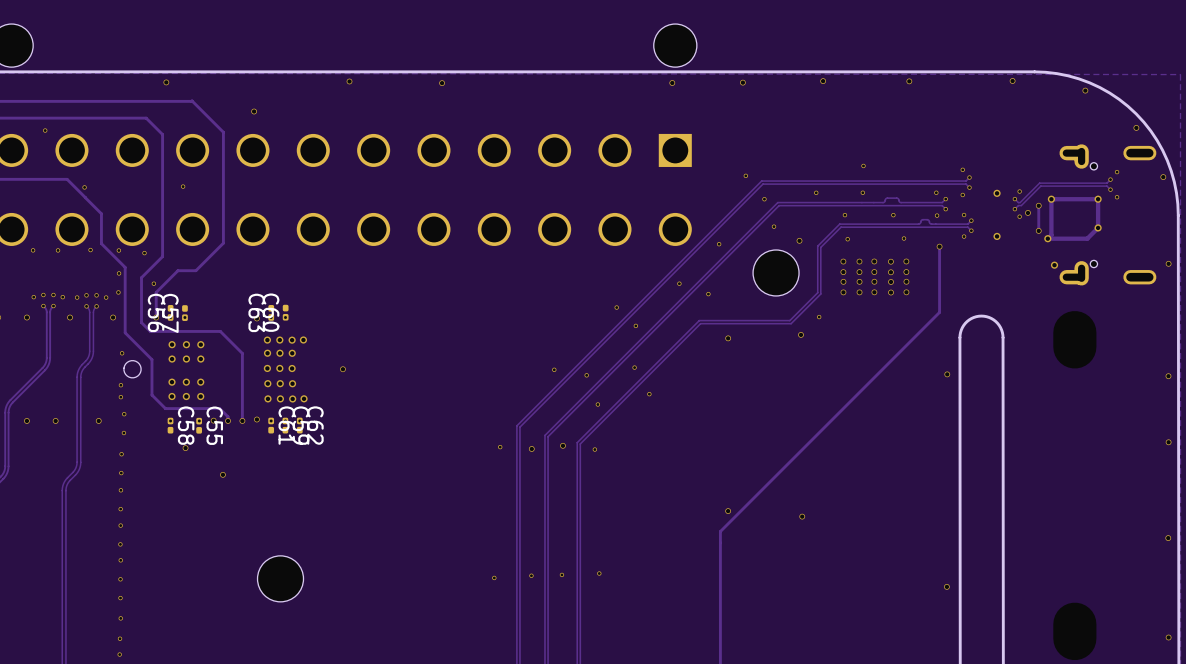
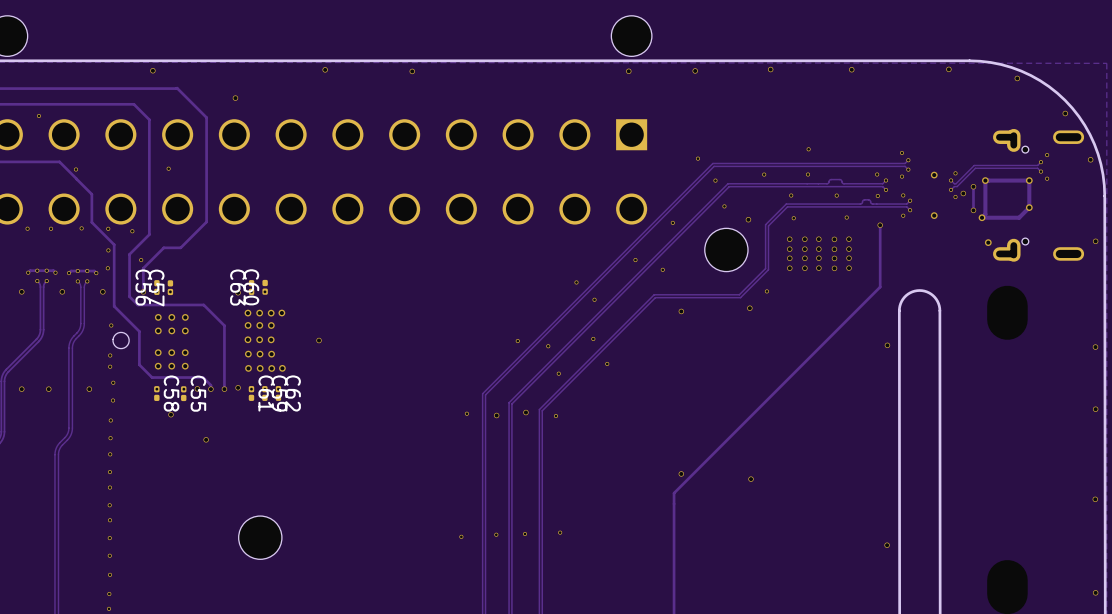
track: none -> (55, 272) (53, 270) (30, 270) (28, 272)
track: none -> (96, 273) (94, 271) (71, 271) (68, 273)

